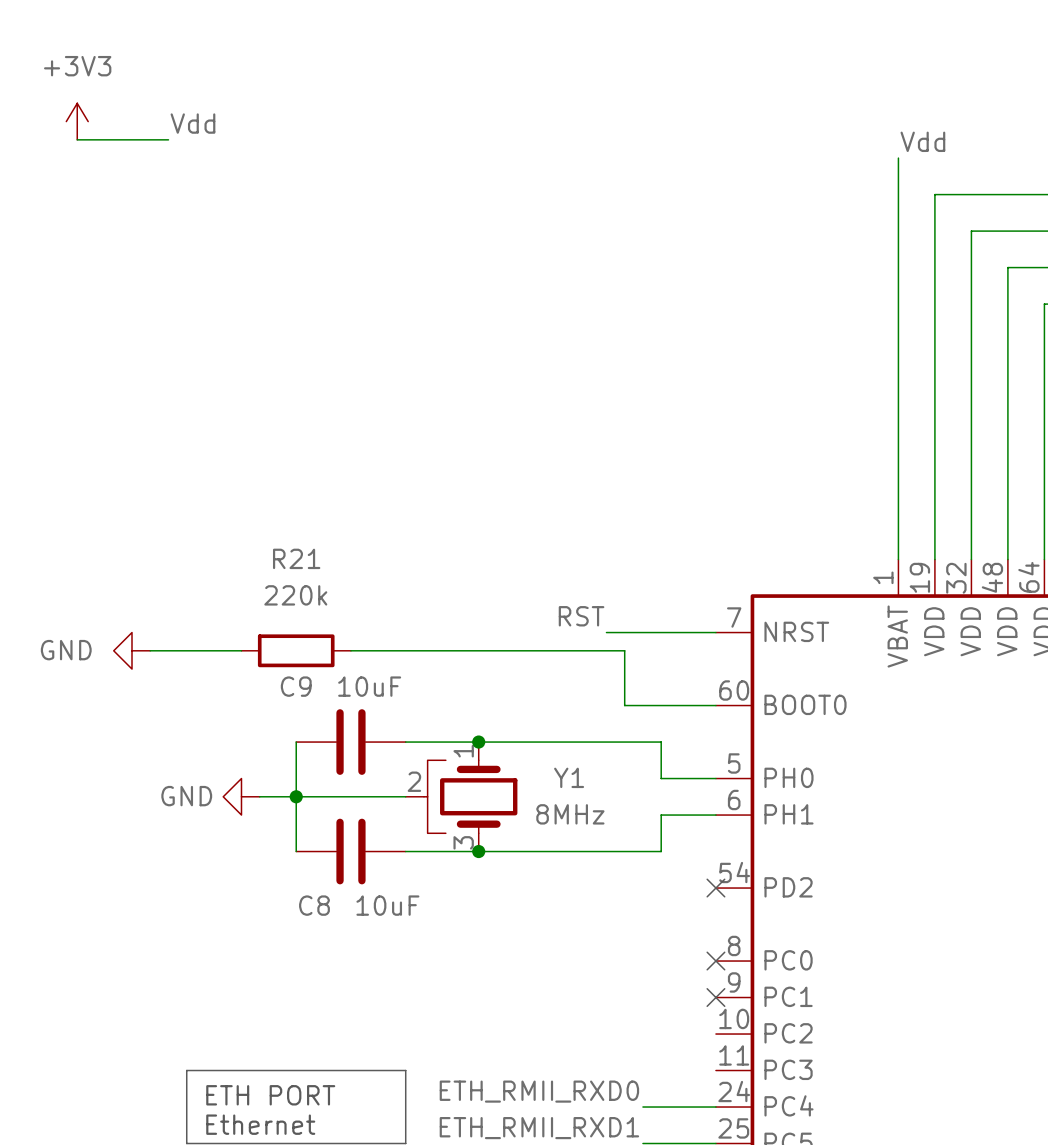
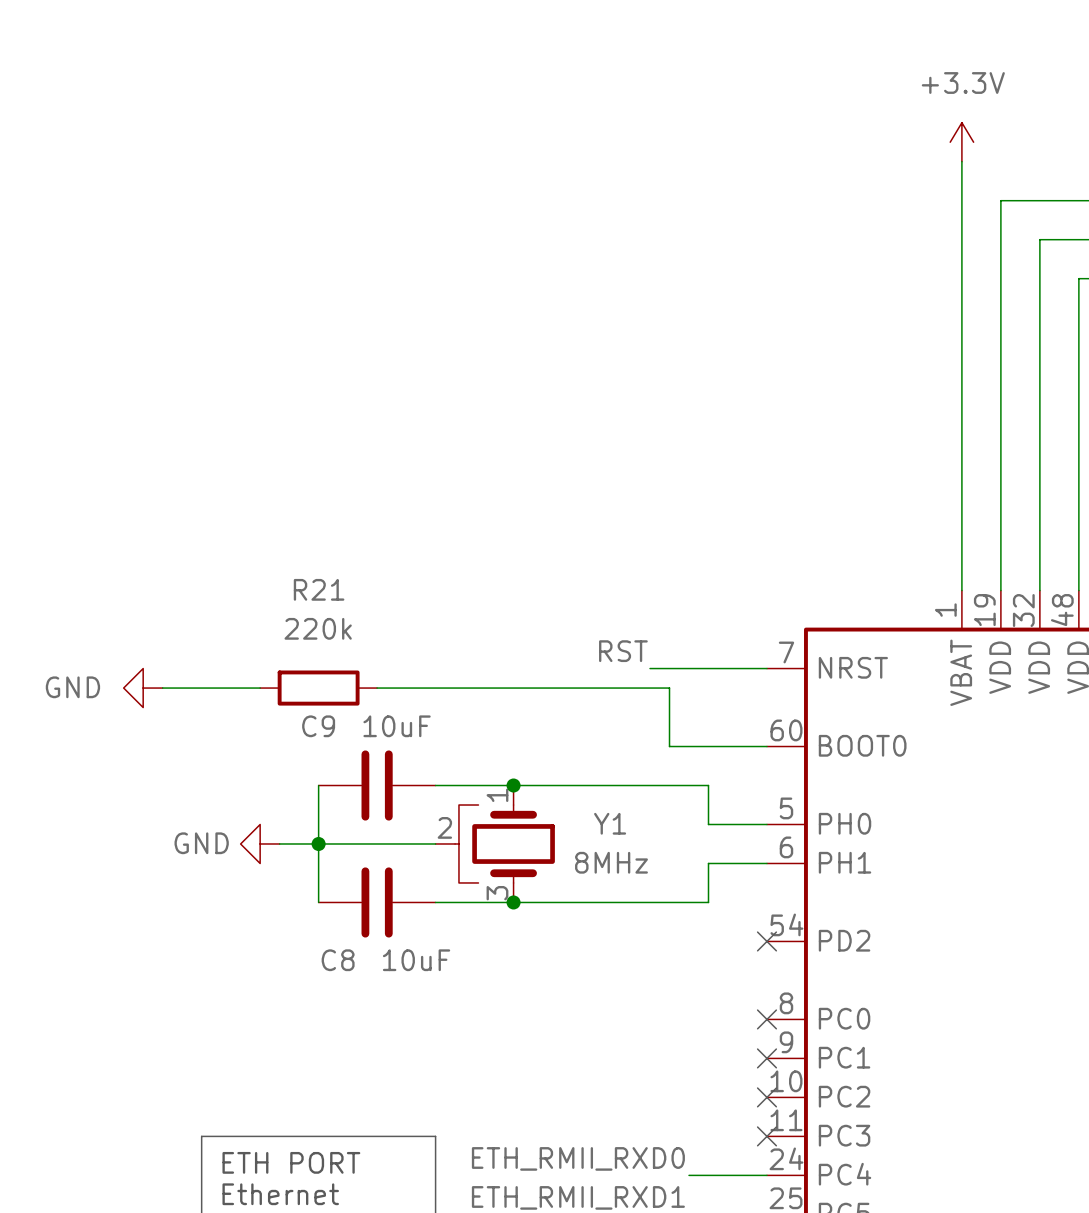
power symbol: +3V3 (77, 121) -> none
label: Vdd (192, 123) -> none
wire: (77, 139) (168, 139) -> none
power symbol: none -> +3.3V (961, 142)
label: Vdd (922, 141) -> none
no-connect mark: none -> (766, 1097)
no-connect mark: none -> (766, 1136)

